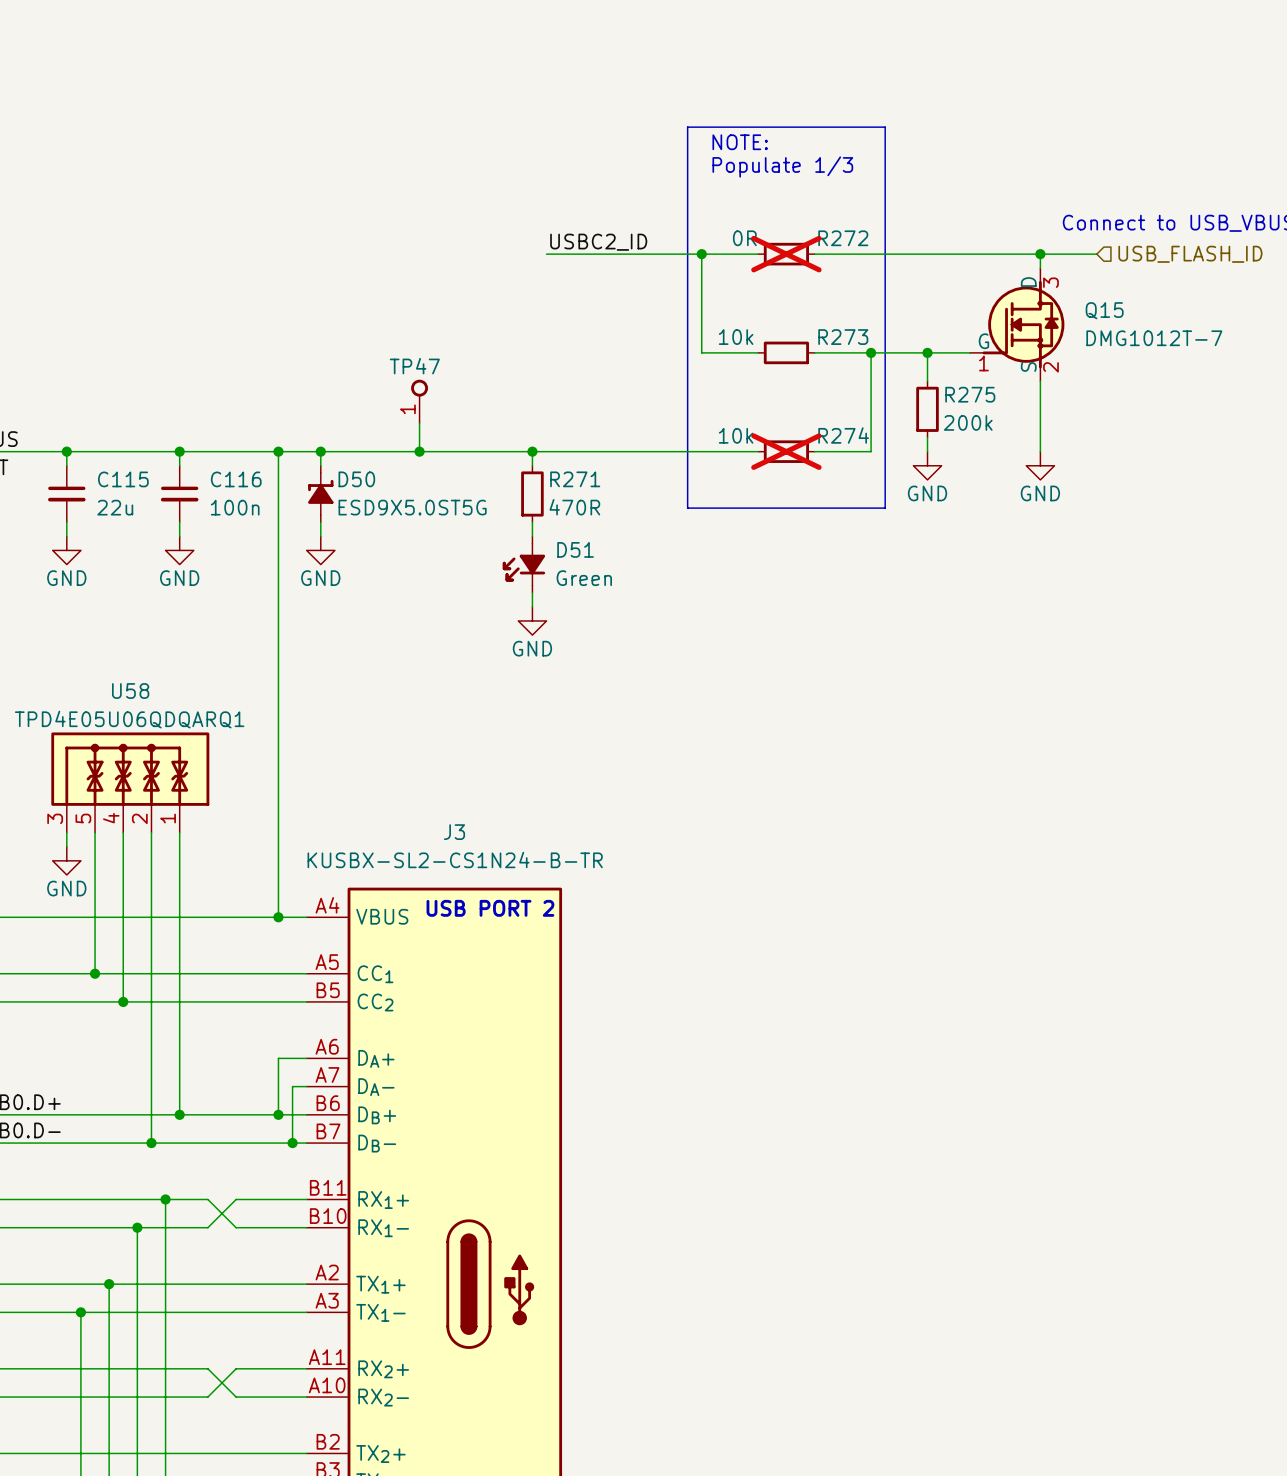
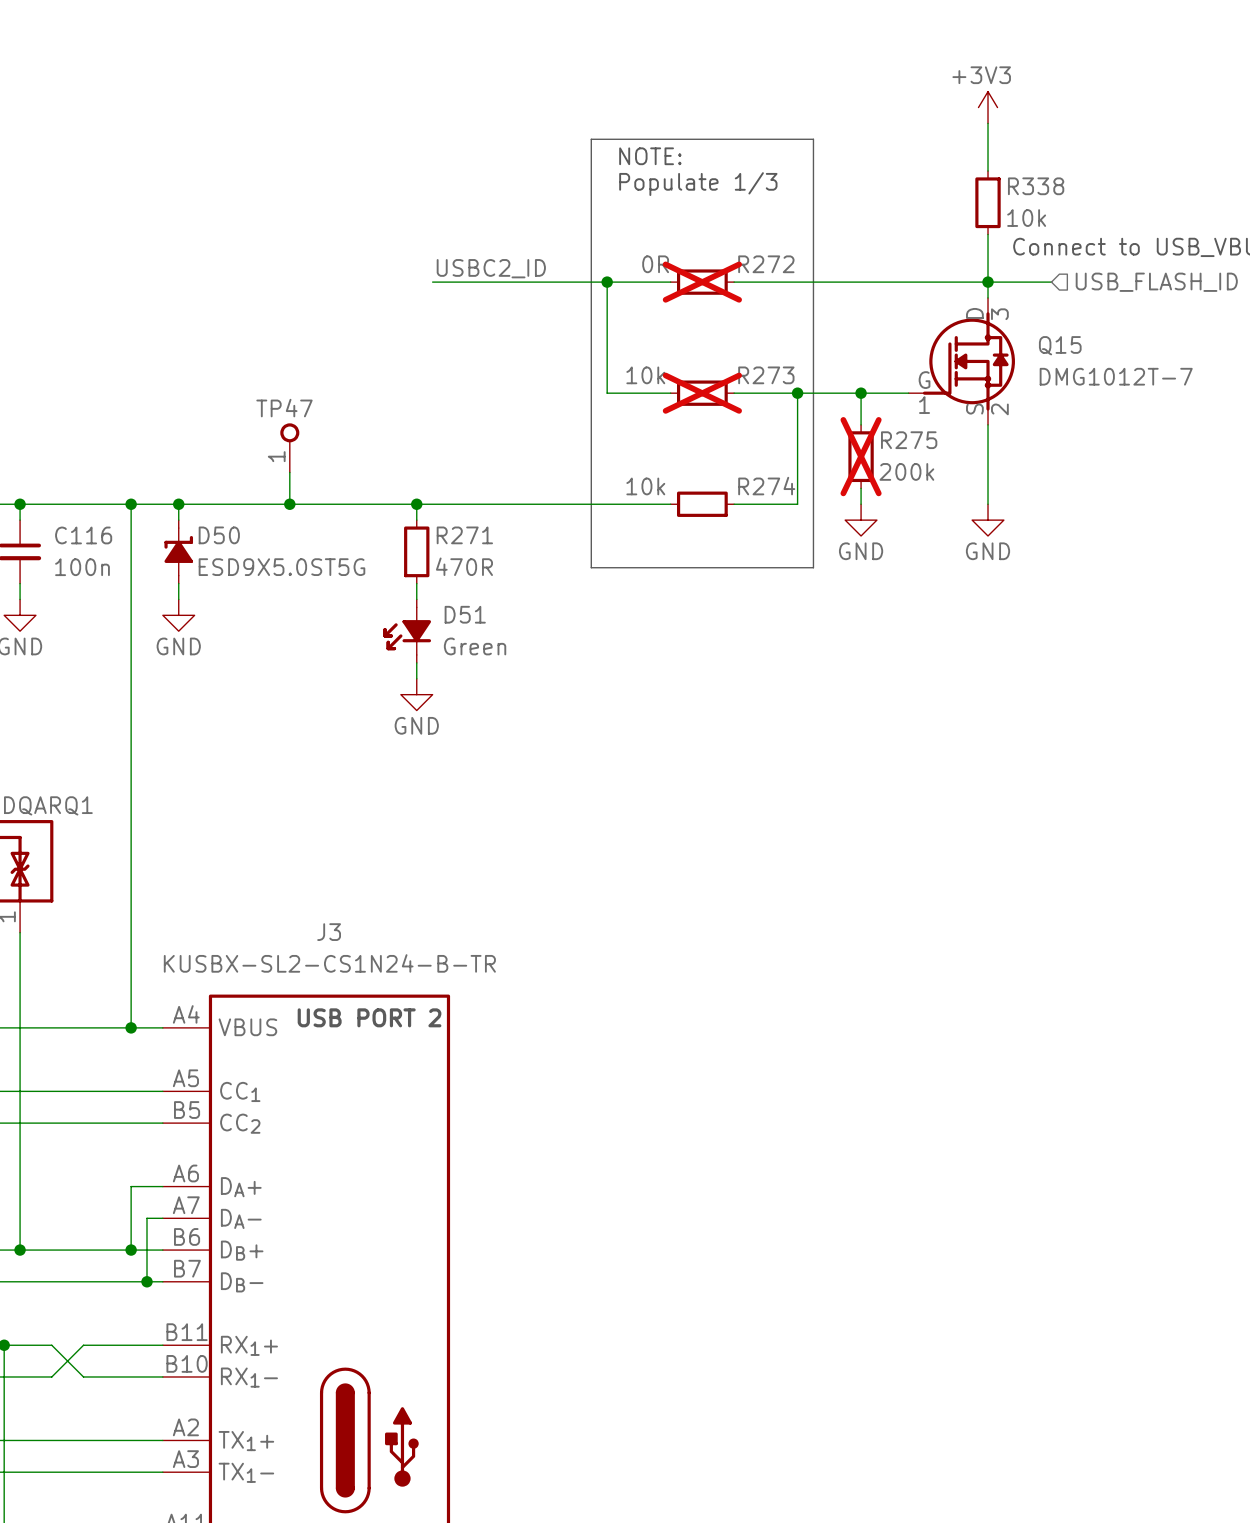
power symbol: none -> +3V3 (988, 107)
wire: none -> (988, 123) (988, 171)
R338: none -> (988, 202)
wire: none -> (988, 234) (988, 282)
R273 do-not-place cross: none -> (702, 393)
R275 do-not-place cross: none -> (861, 456)
R274 do-not-place cross: (786, 451) -> none

